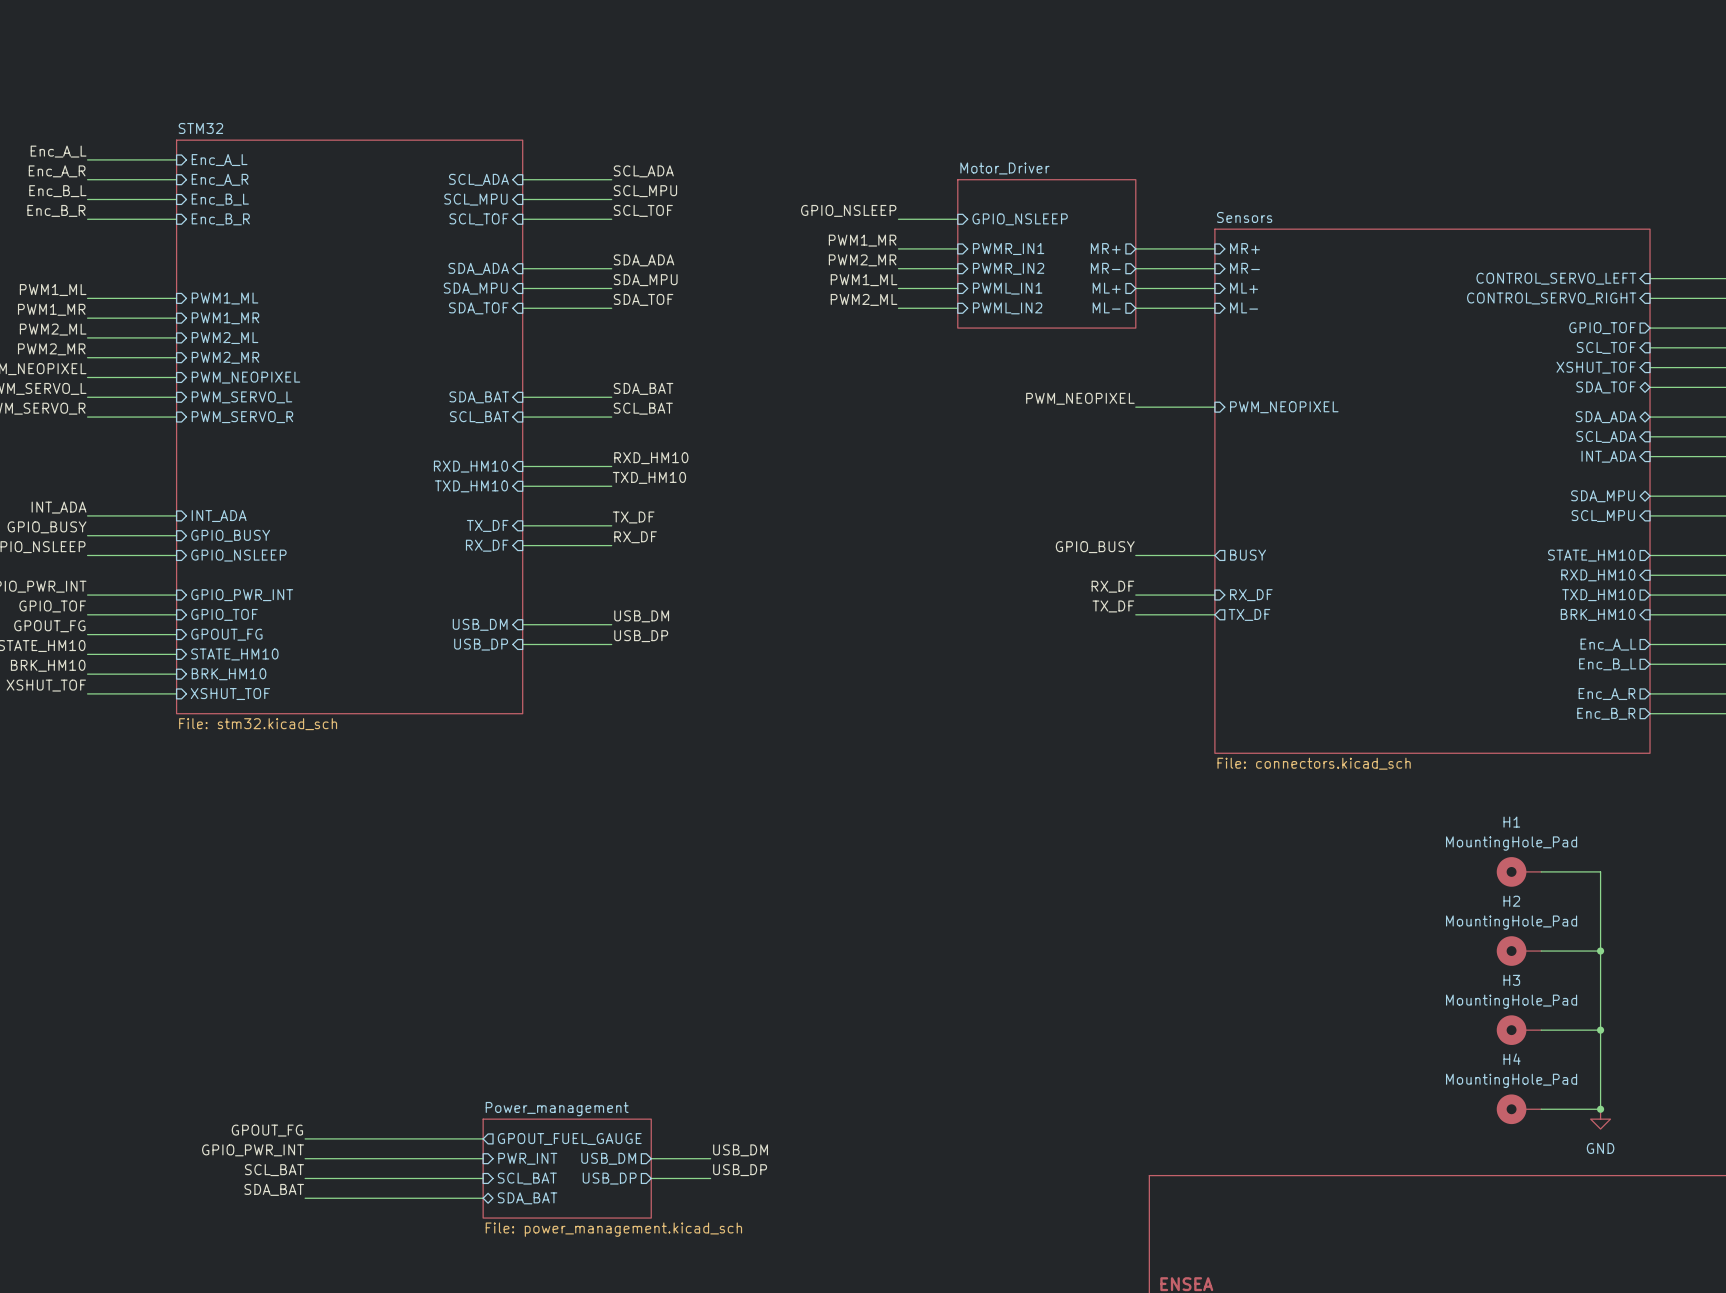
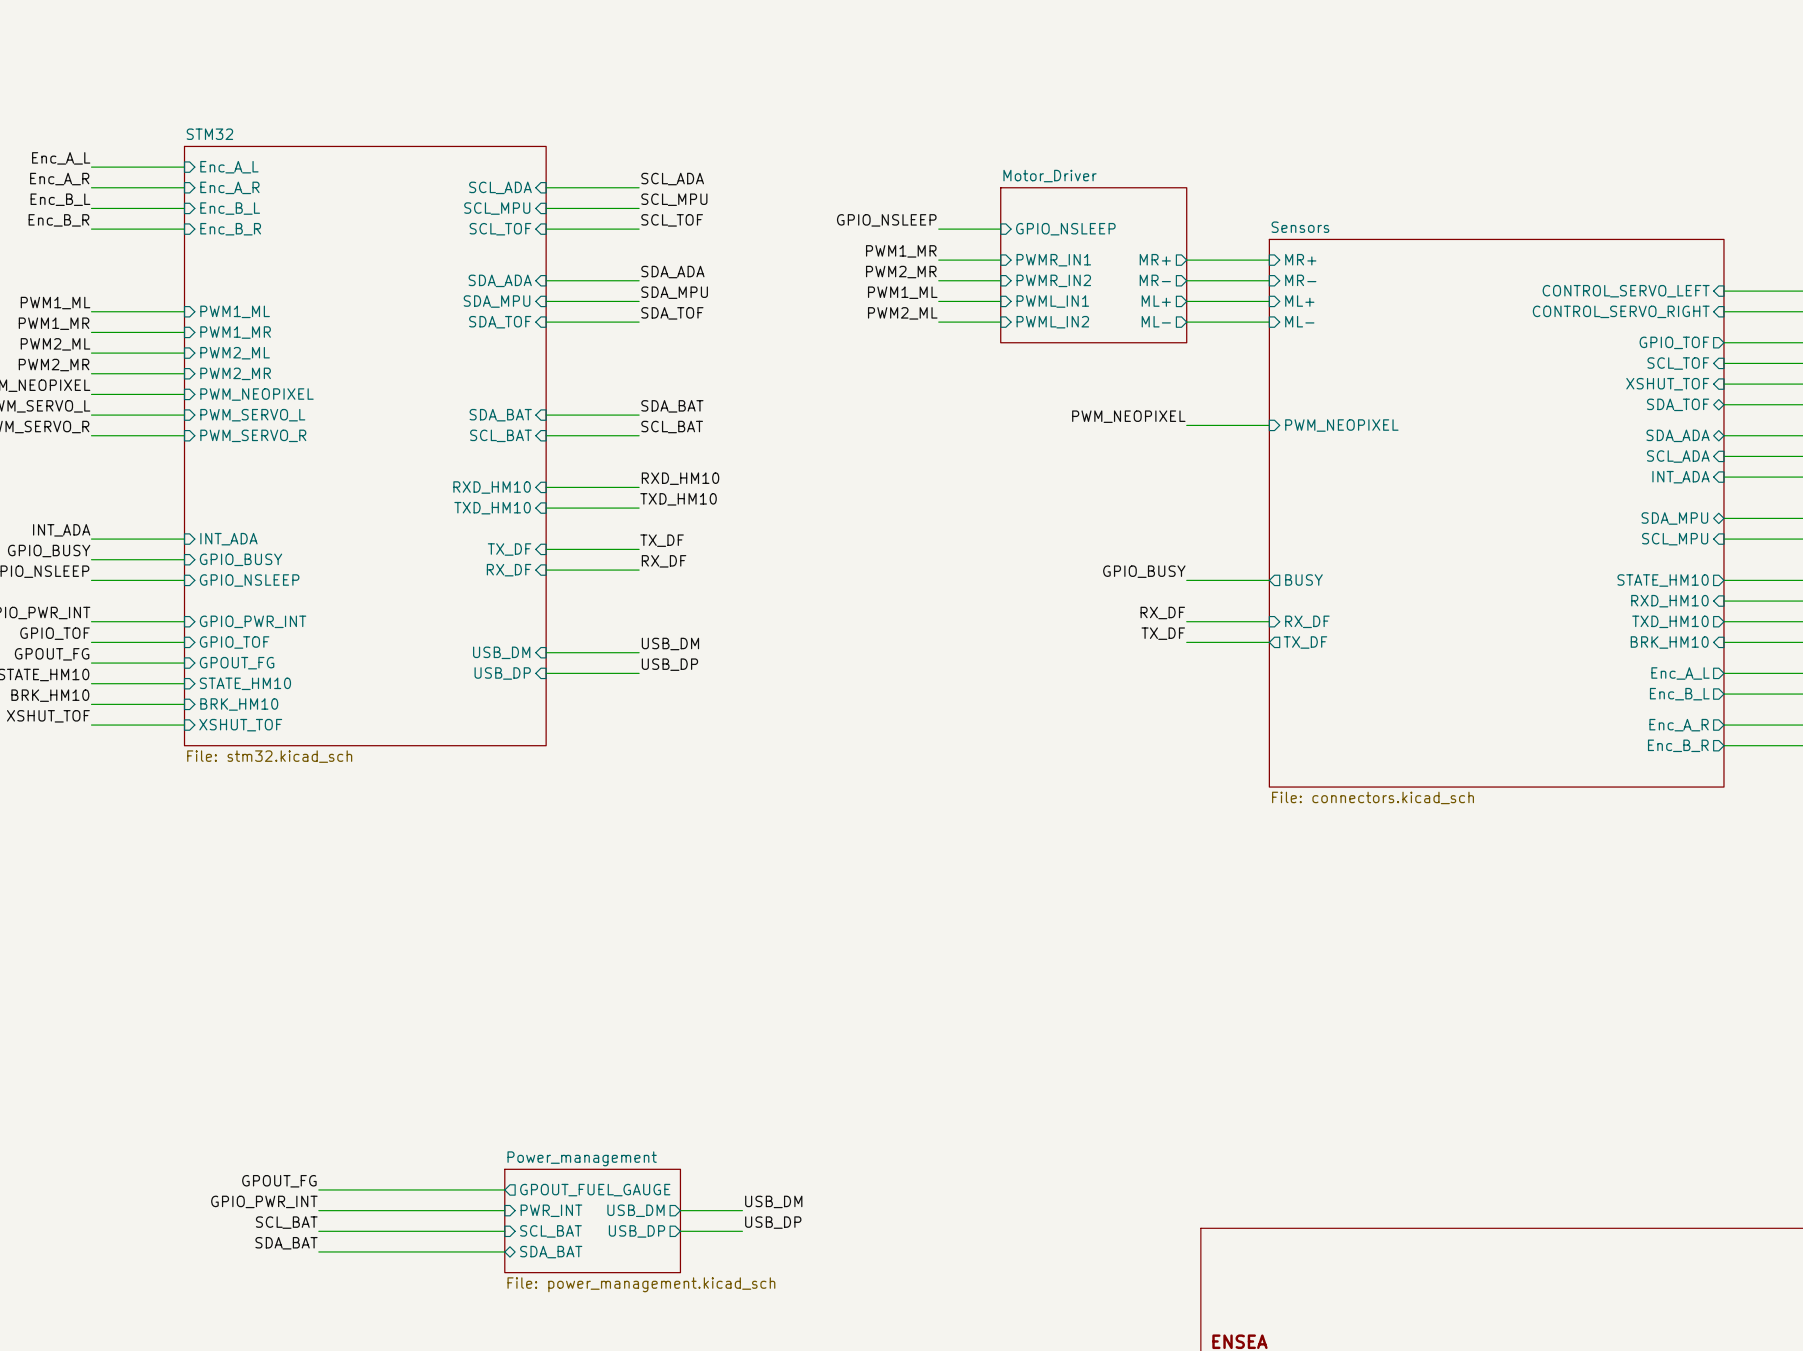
H1: MountingHole_Pad (1518, 871) -> none
wire: (1541, 871) (1600, 871) (1600, 1109) (1541, 1109) -> none
H2: MountingHole_Pad (1518, 951) -> none
wire: (1541, 951) (1600, 951) -> none
junction: (1600, 951) -> none
H3: MountingHole_Pad (1518, 1030) -> none
wire: (1541, 1030) (1600, 1030) -> none
junction: (1600, 1030) -> none
H4: MountingHole_Pad (1518, 1109) -> none
junction: (1600, 1109) -> none
power symbol: GND (1600, 1119) -> none

